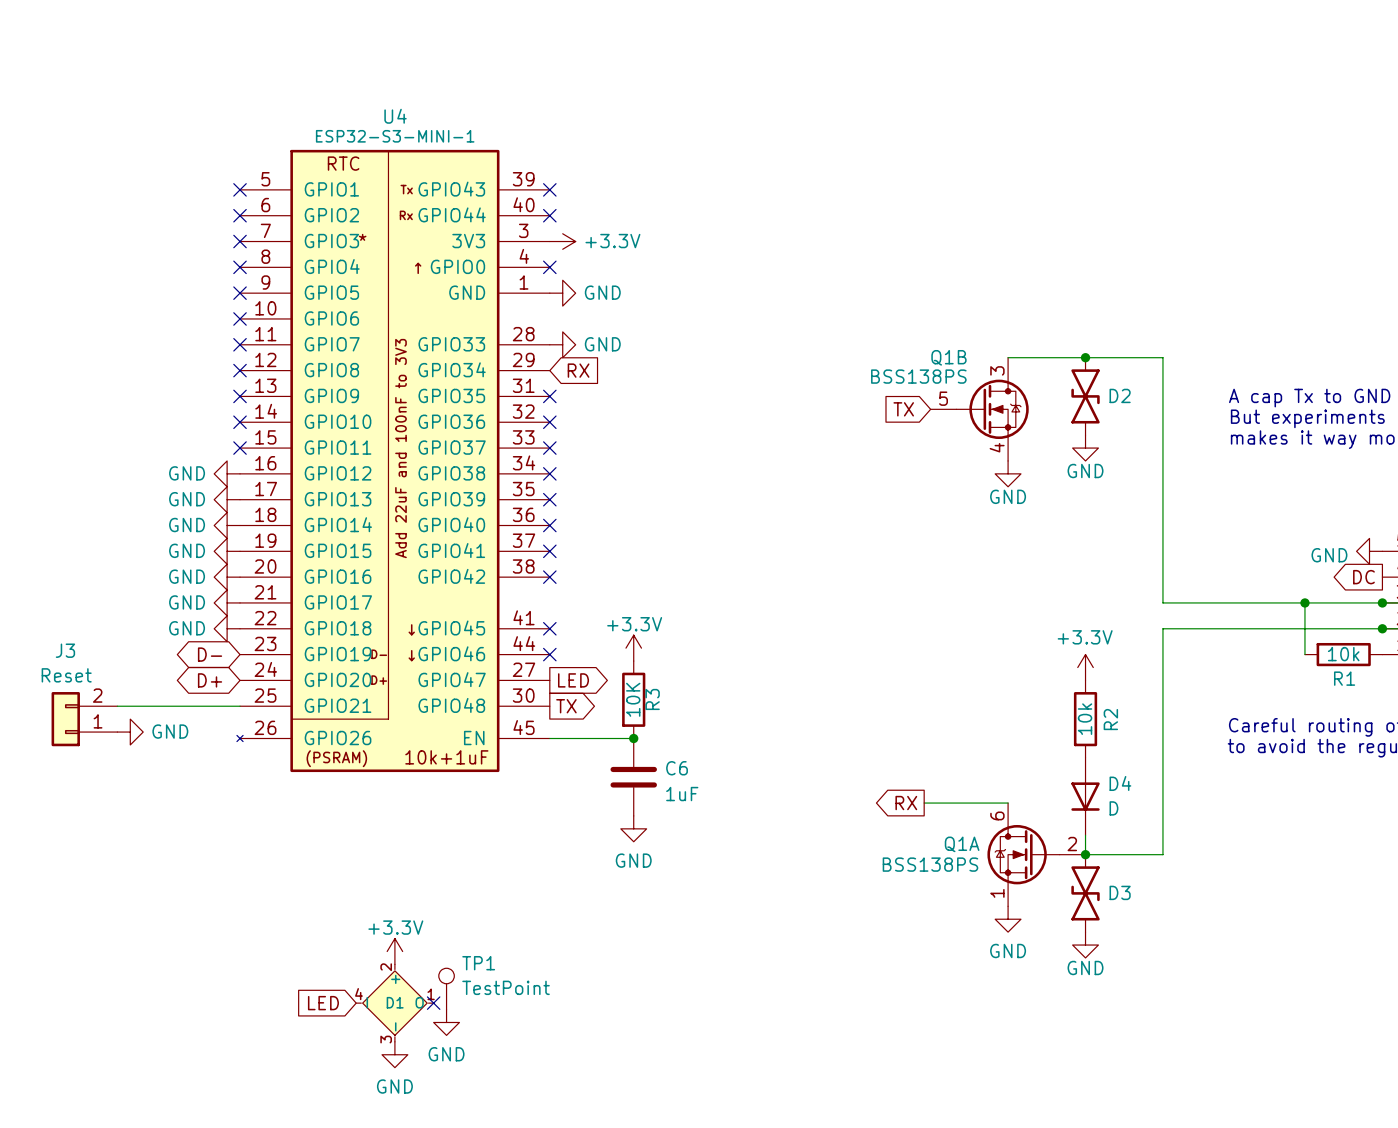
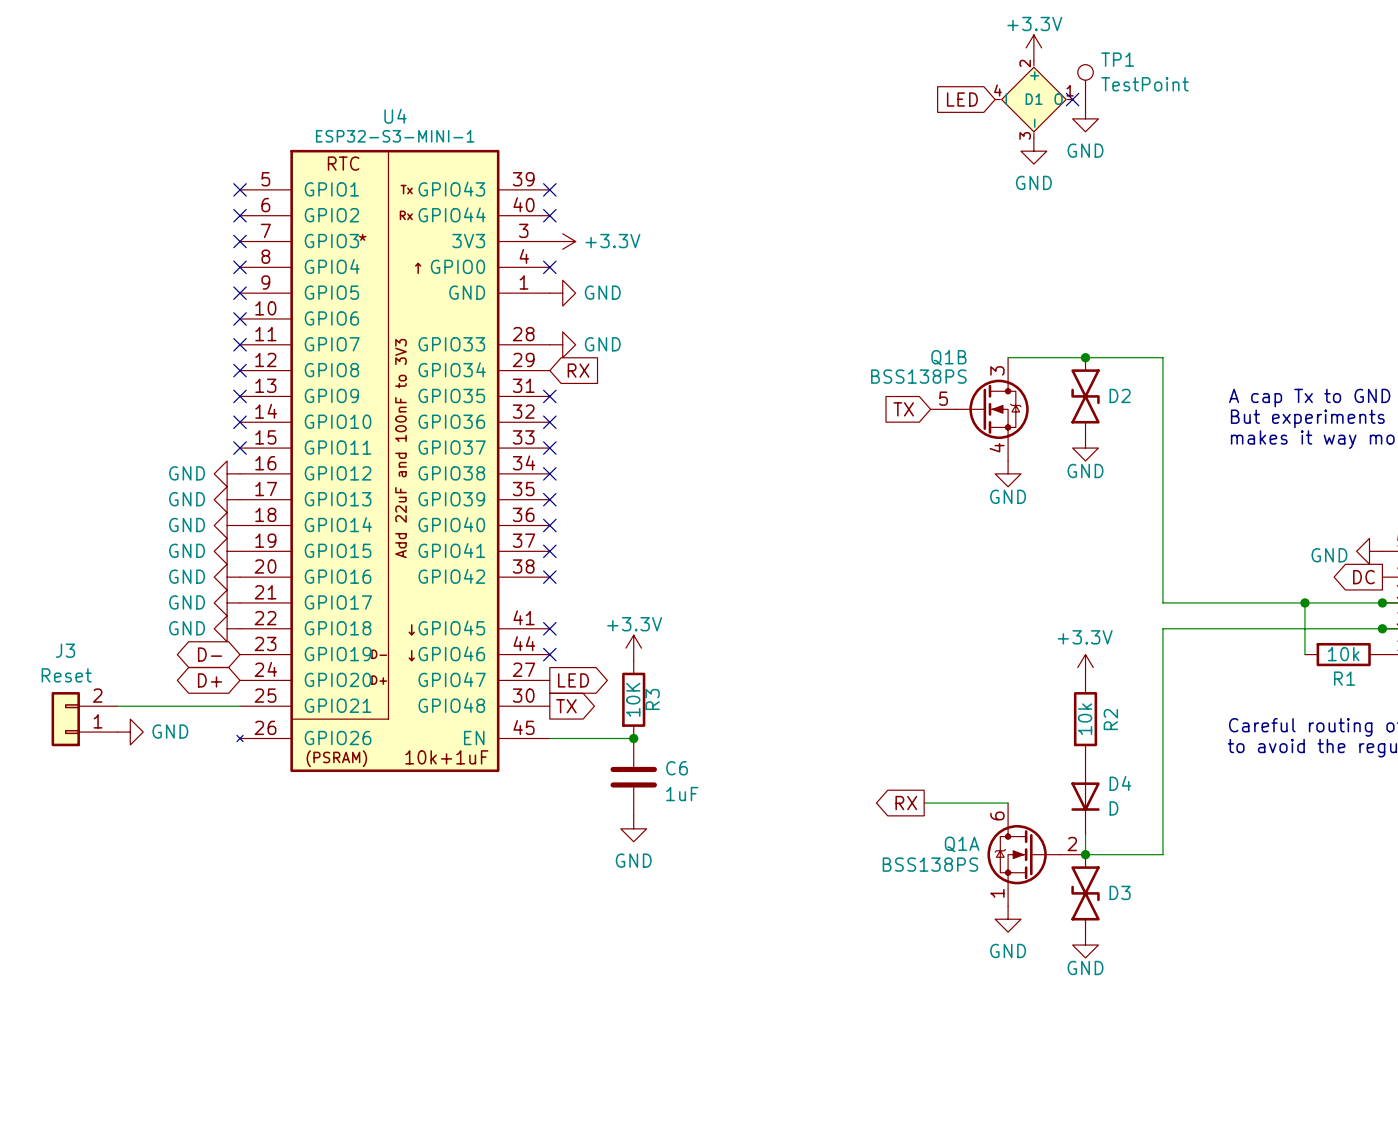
power symbol: none -> +3.3V (1033, 47)
global label: none -> LED (962, 99)
no-connect mark: none -> (1072, 99)
power symbol: none -> GND (1085, 118)
power symbol: none -> GND (1033, 151)
power symbol: +3.3V (394, 951) -> none
TP1 position: (446, 988) -> (1085, 85)
global label: LED (323, 1003) -> none
D1 position: (394, 1003) -> (1033, 99)
no-connect mark: (433, 1003) -> none
power symbol: GND (446, 1022) -> none
power symbol: GND (394, 1054) -> none

